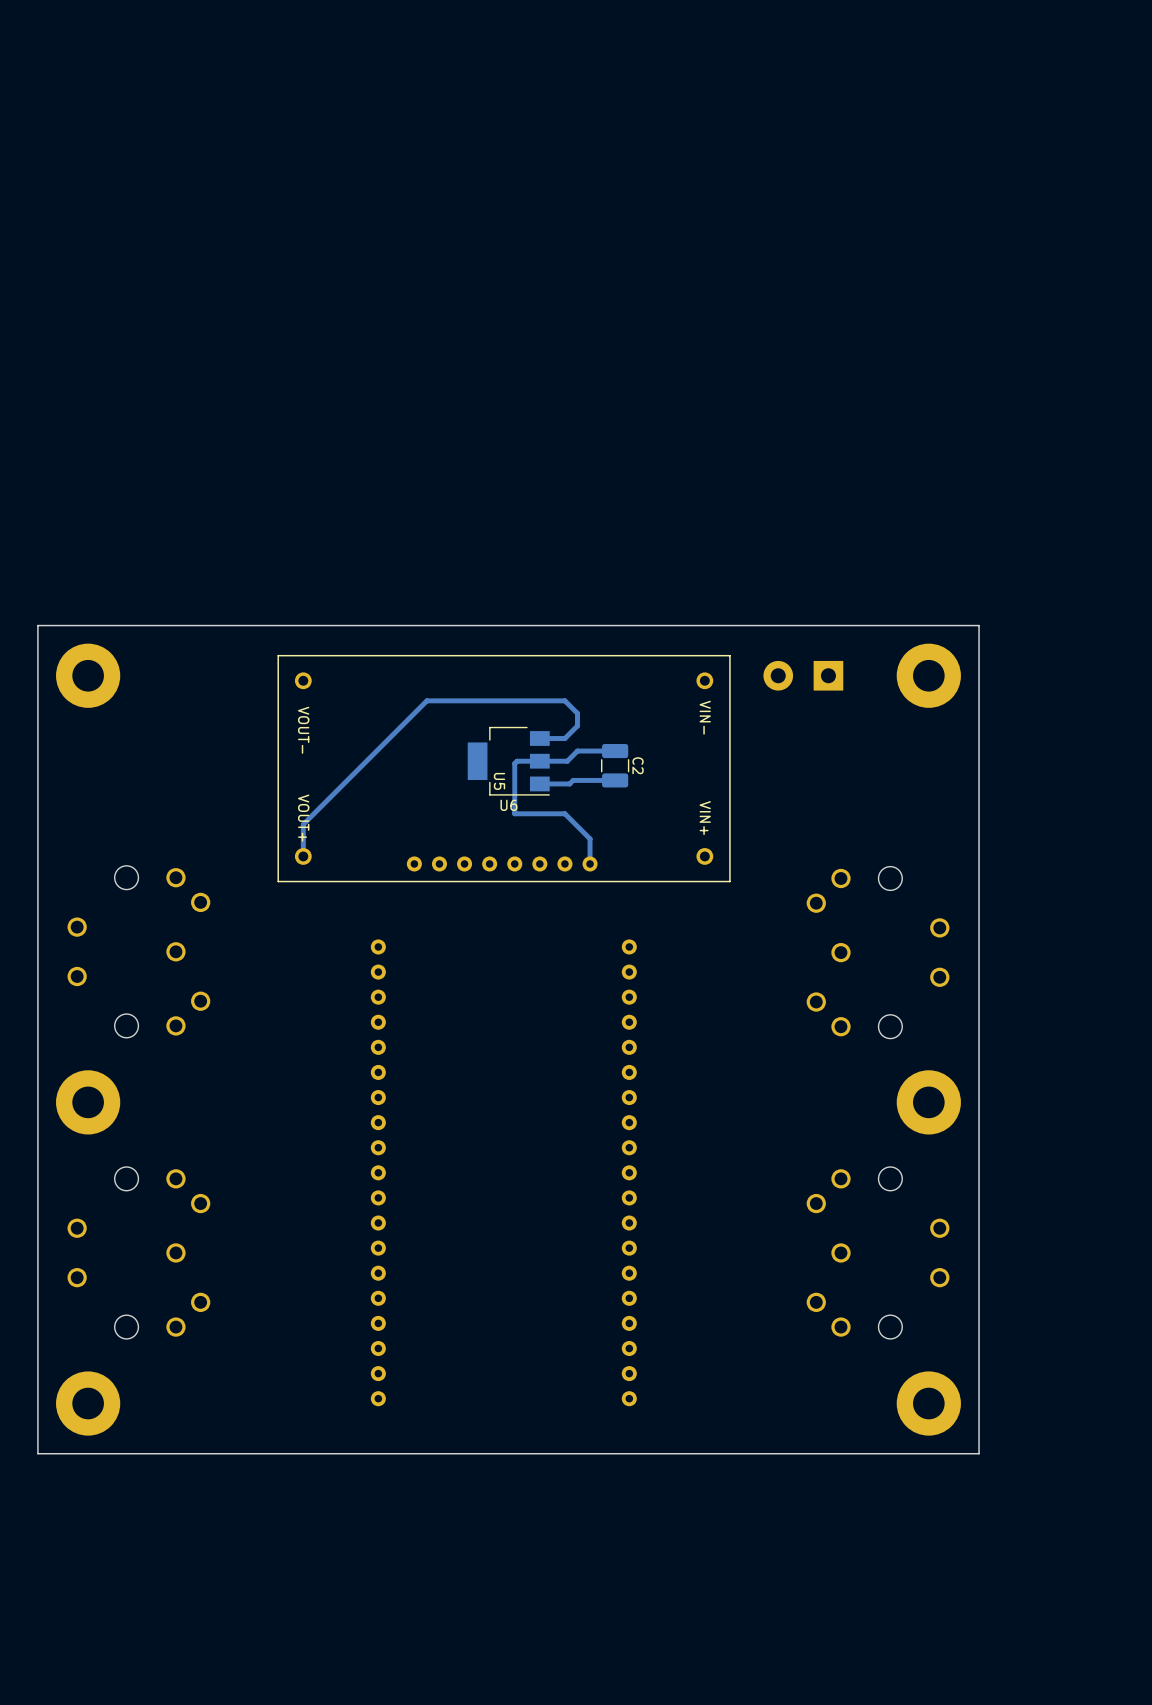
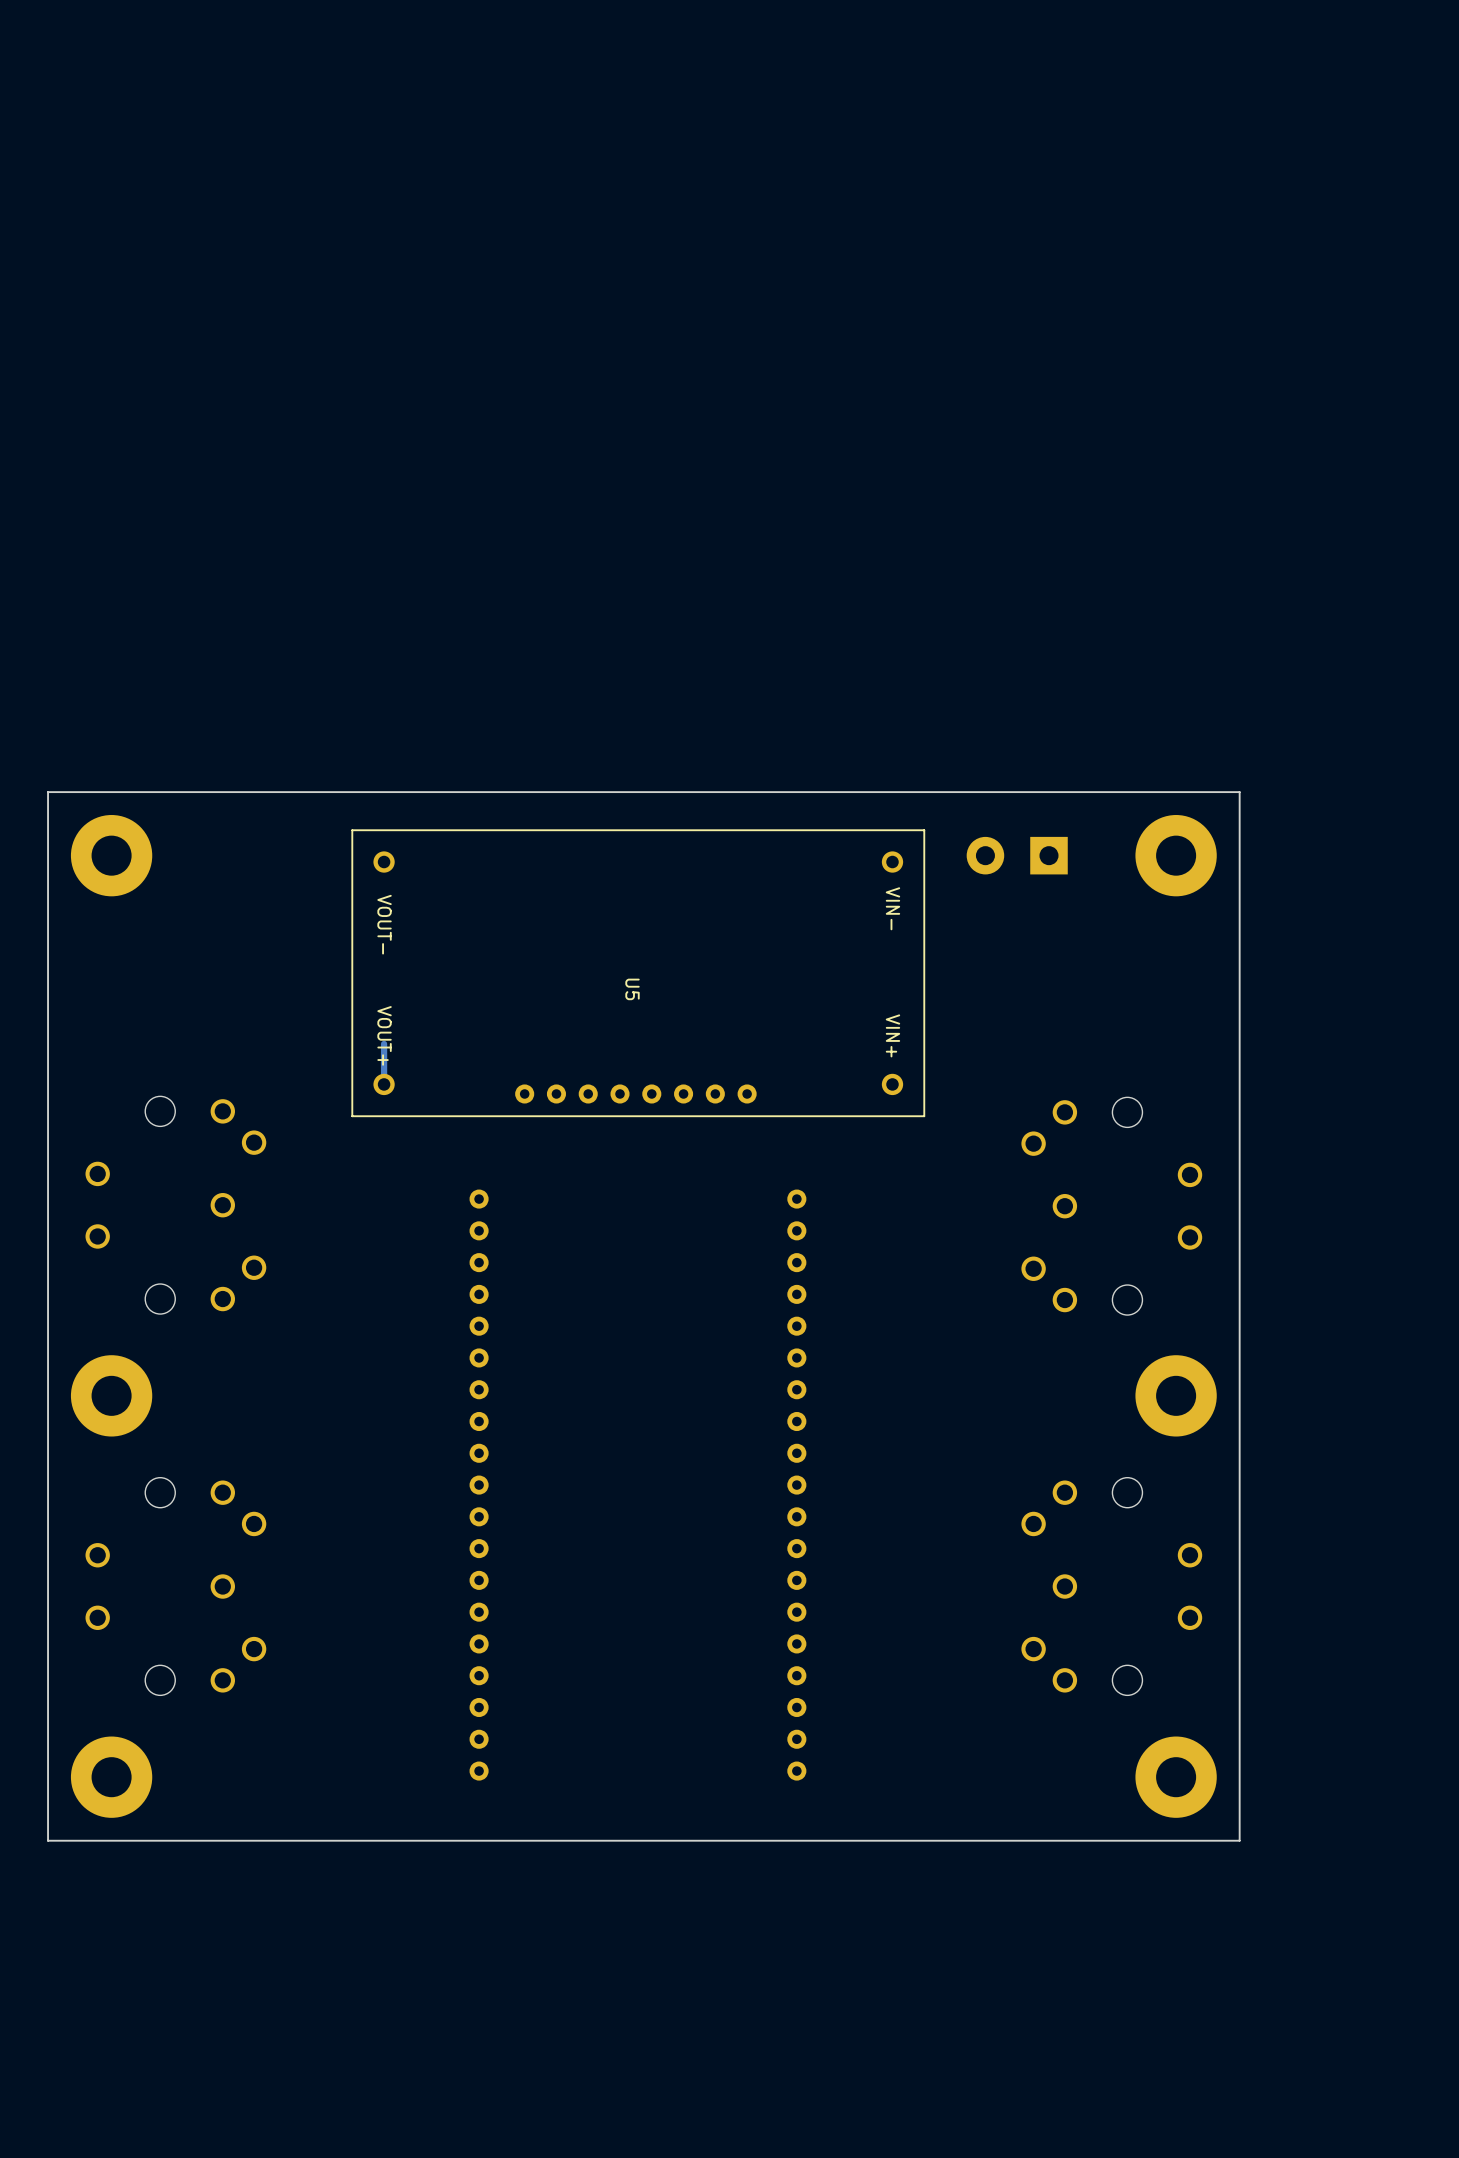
track: (539, 738) (564, 738) (577, 725) (577, 713) (564, 700) (426, 700) (303, 824) -> none
track: (615, 751) (577, 751) (567, 761) (517, 761) (514, 763) (514, 813) (564, 813) (590, 838) (590, 863) -> none
U6: (508, 761) -> none
C2: (615, 765) -> none
track: (615, 780) (573, 780) (569, 783) (539, 783) -> none

